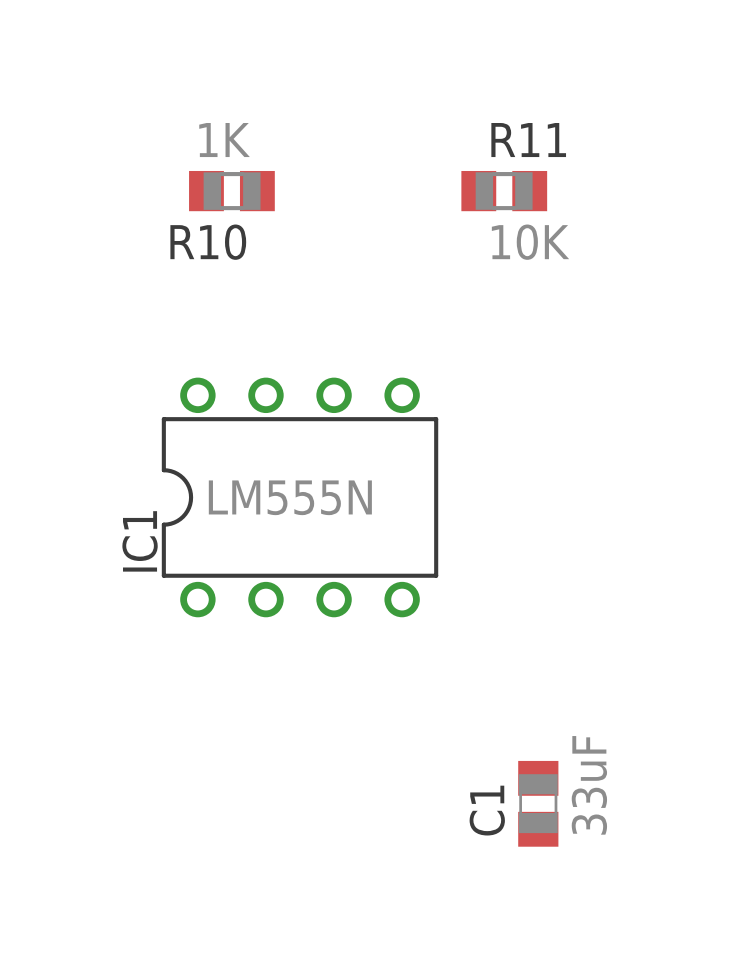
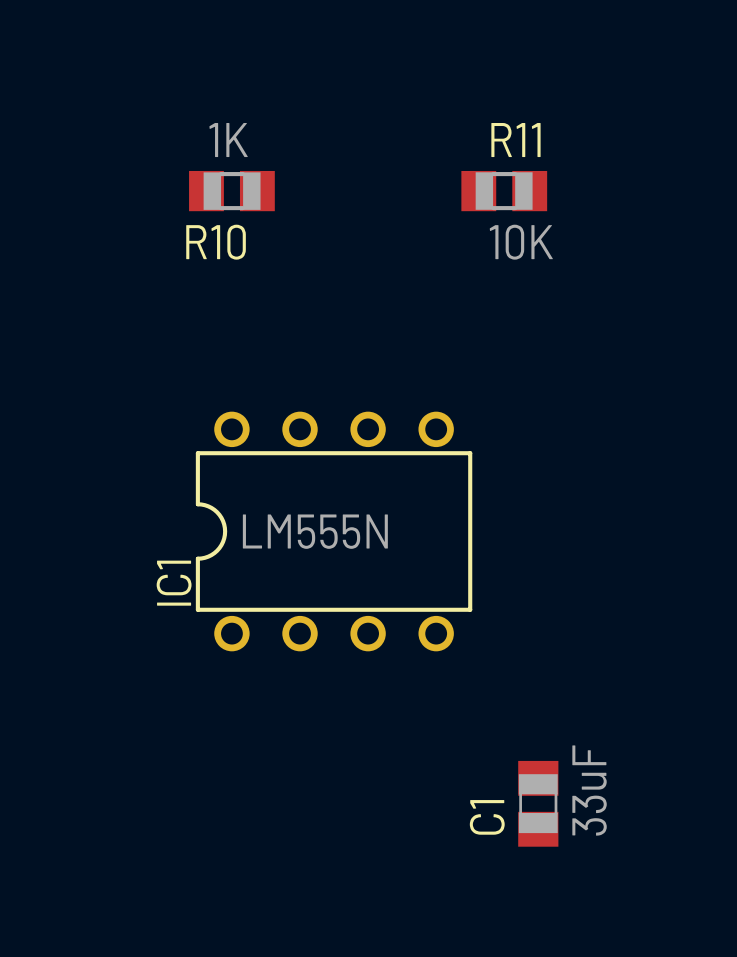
IC1 position: (300, 497) -> (334, 531)

